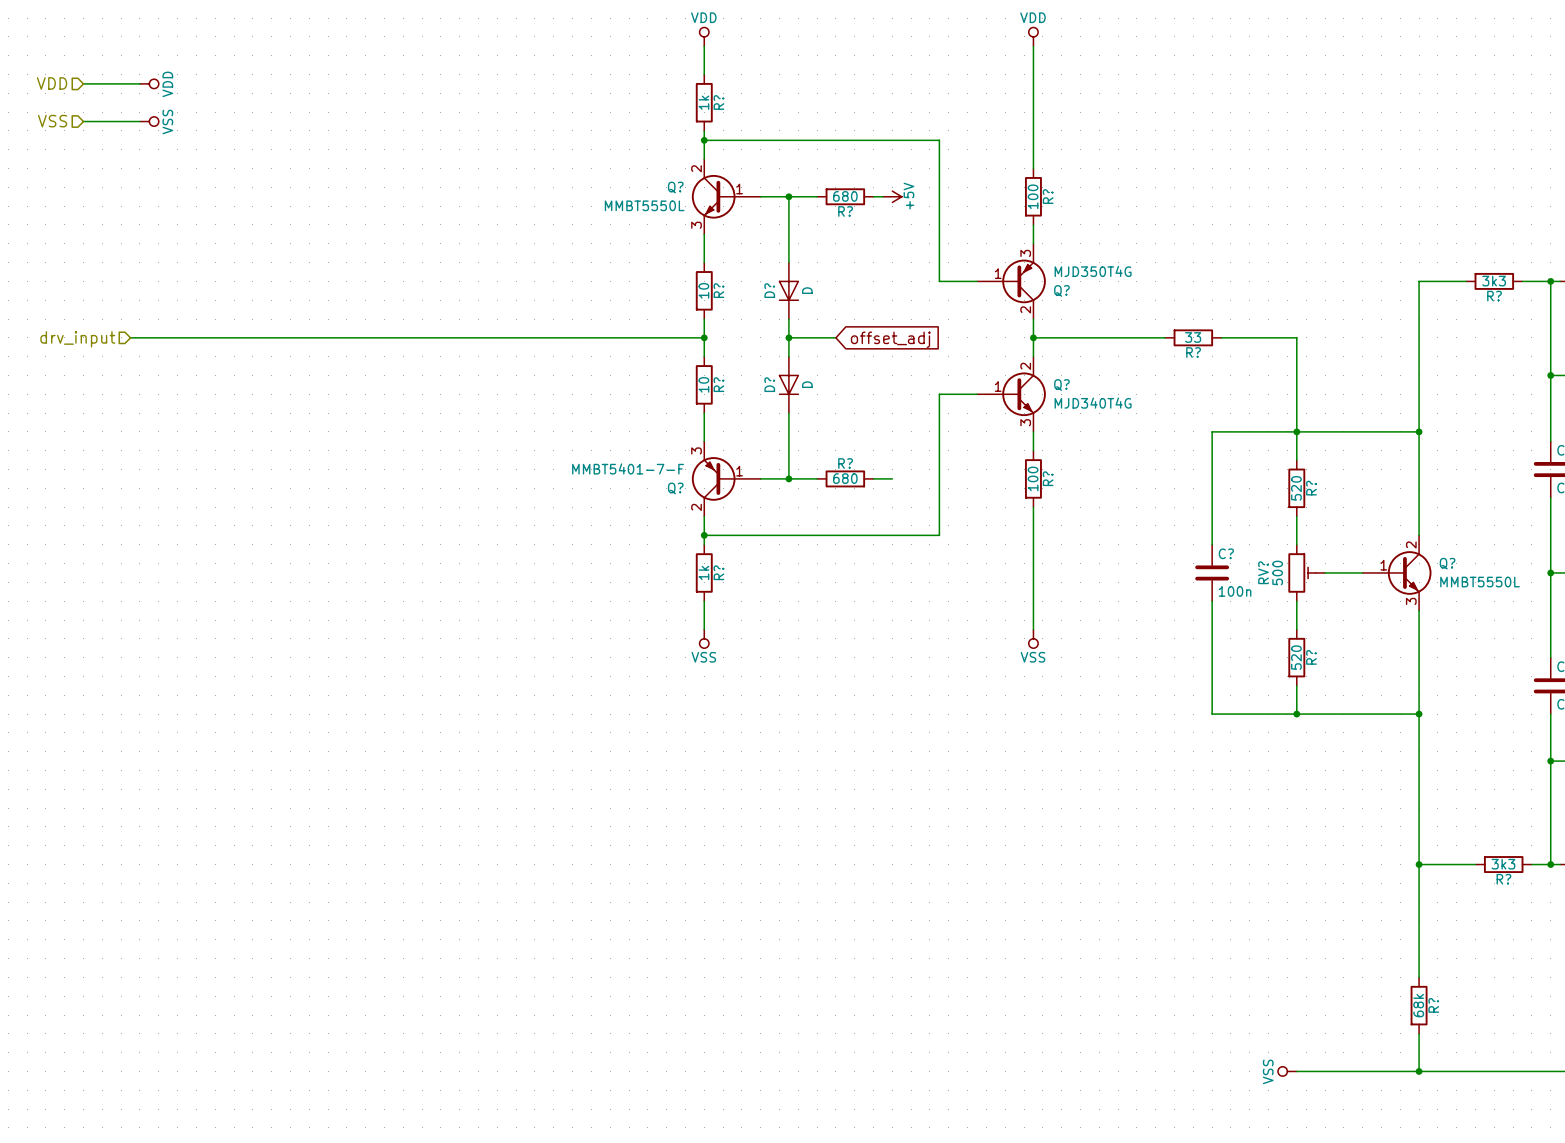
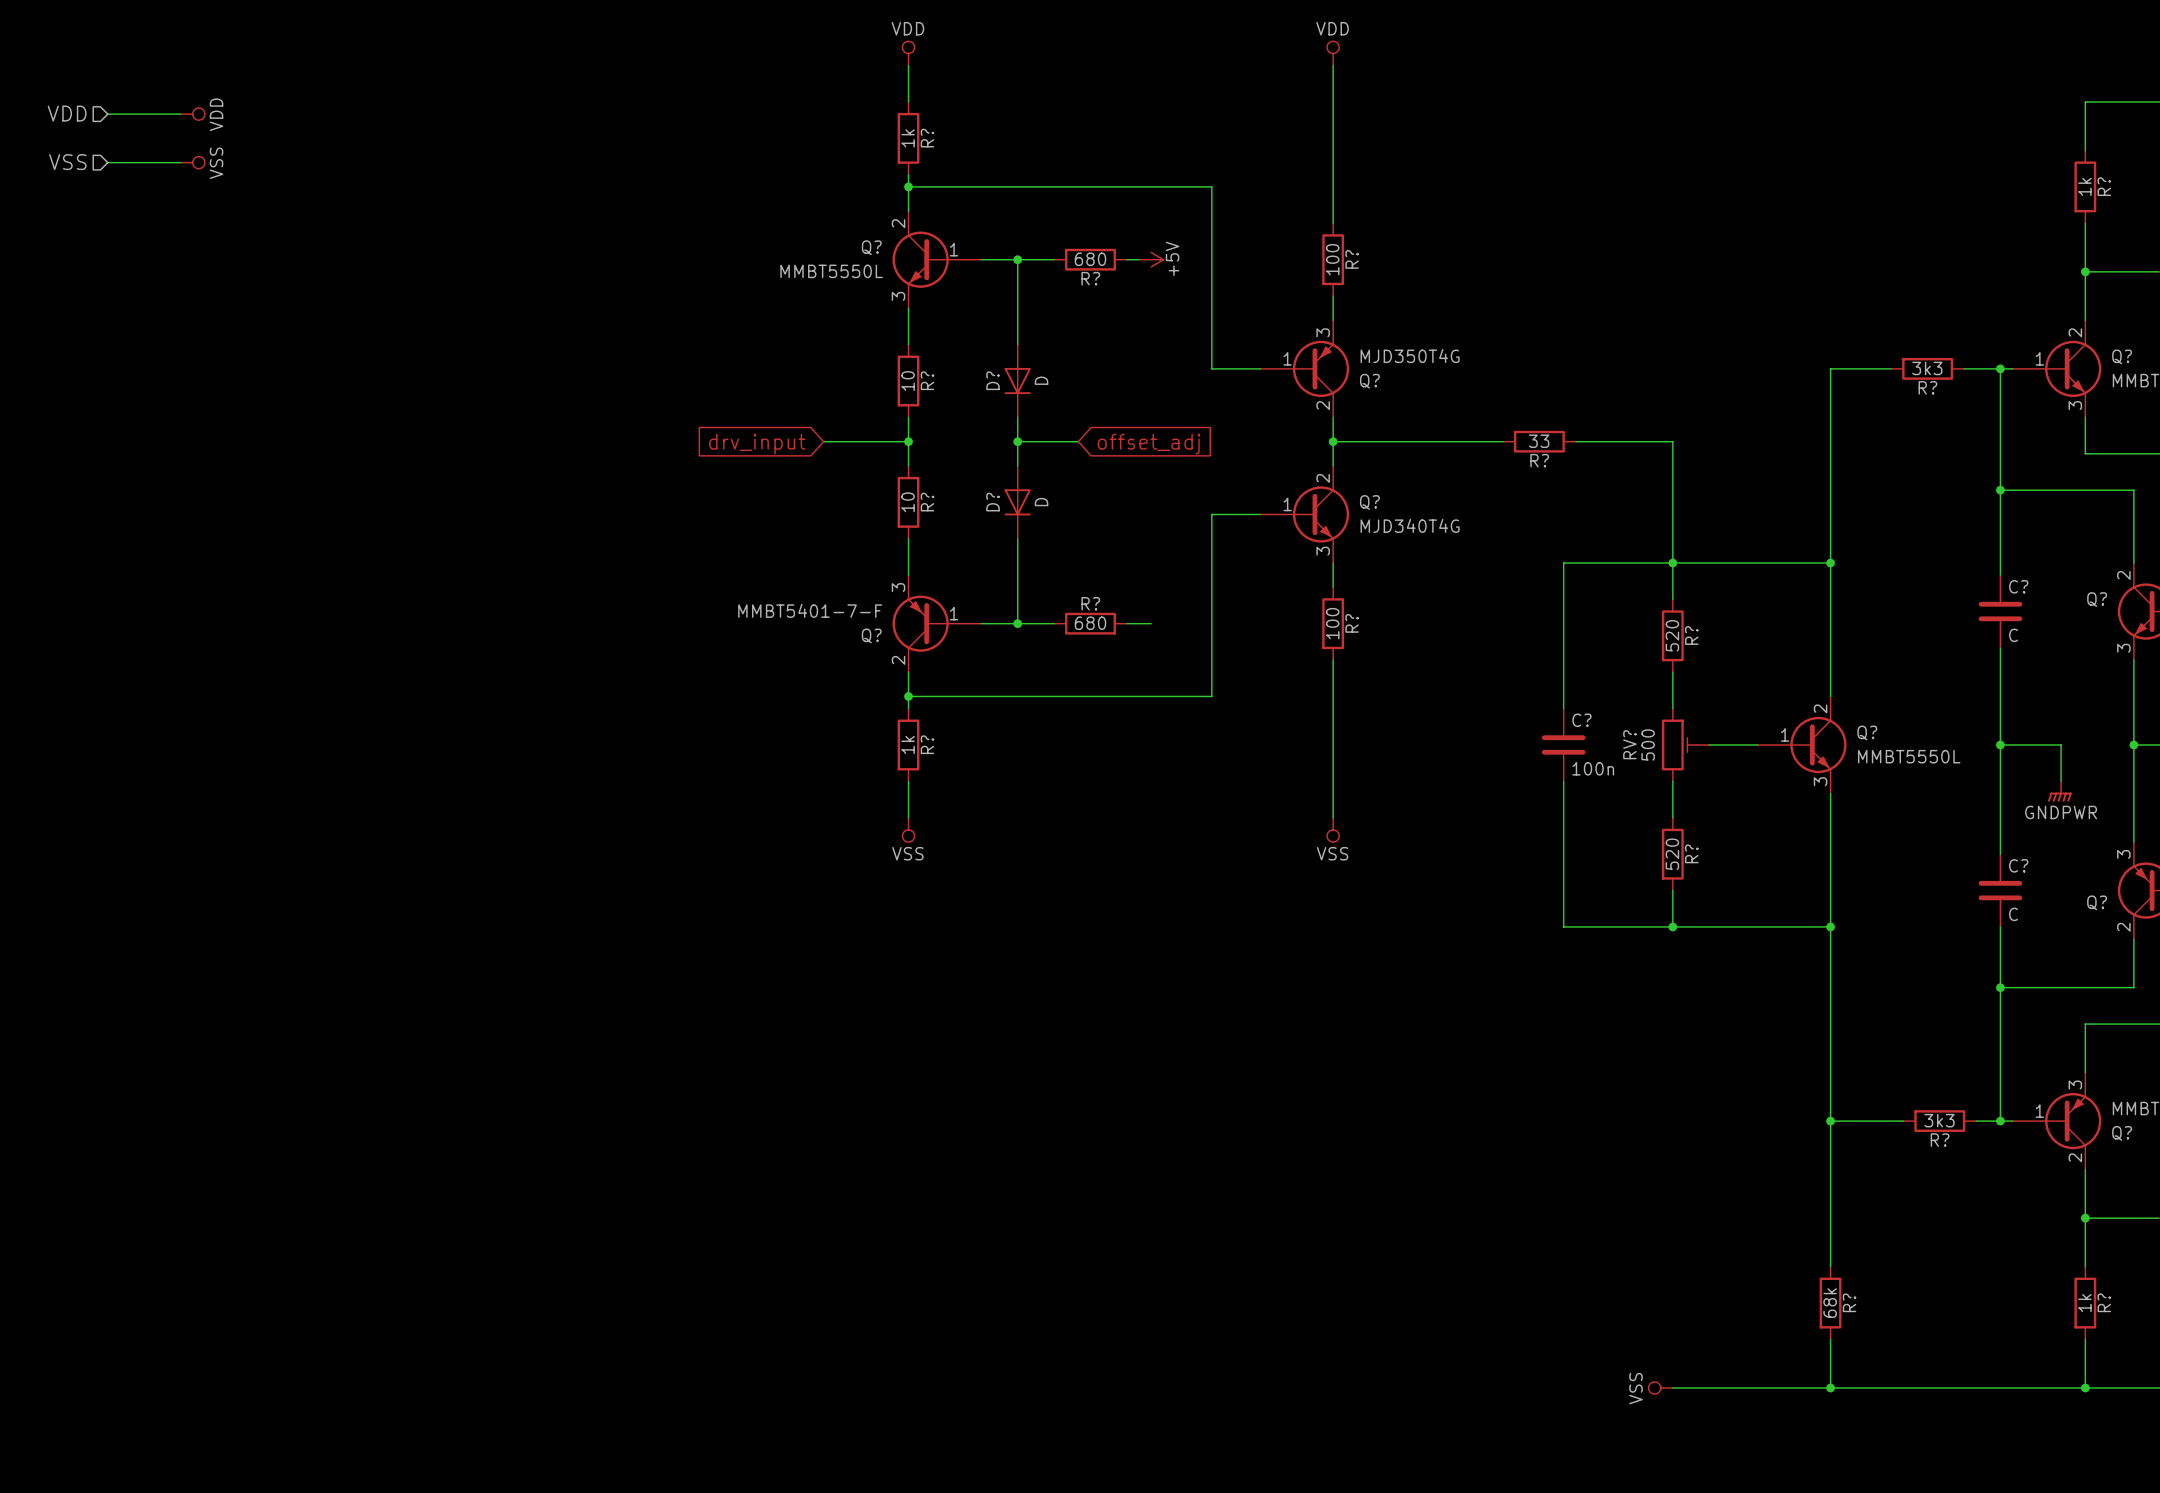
wire: (130, 337) (638, 337) -> none
hierarchical label: drv_input (77, 339) -> none
global label: none -> drv_input (757, 444)

